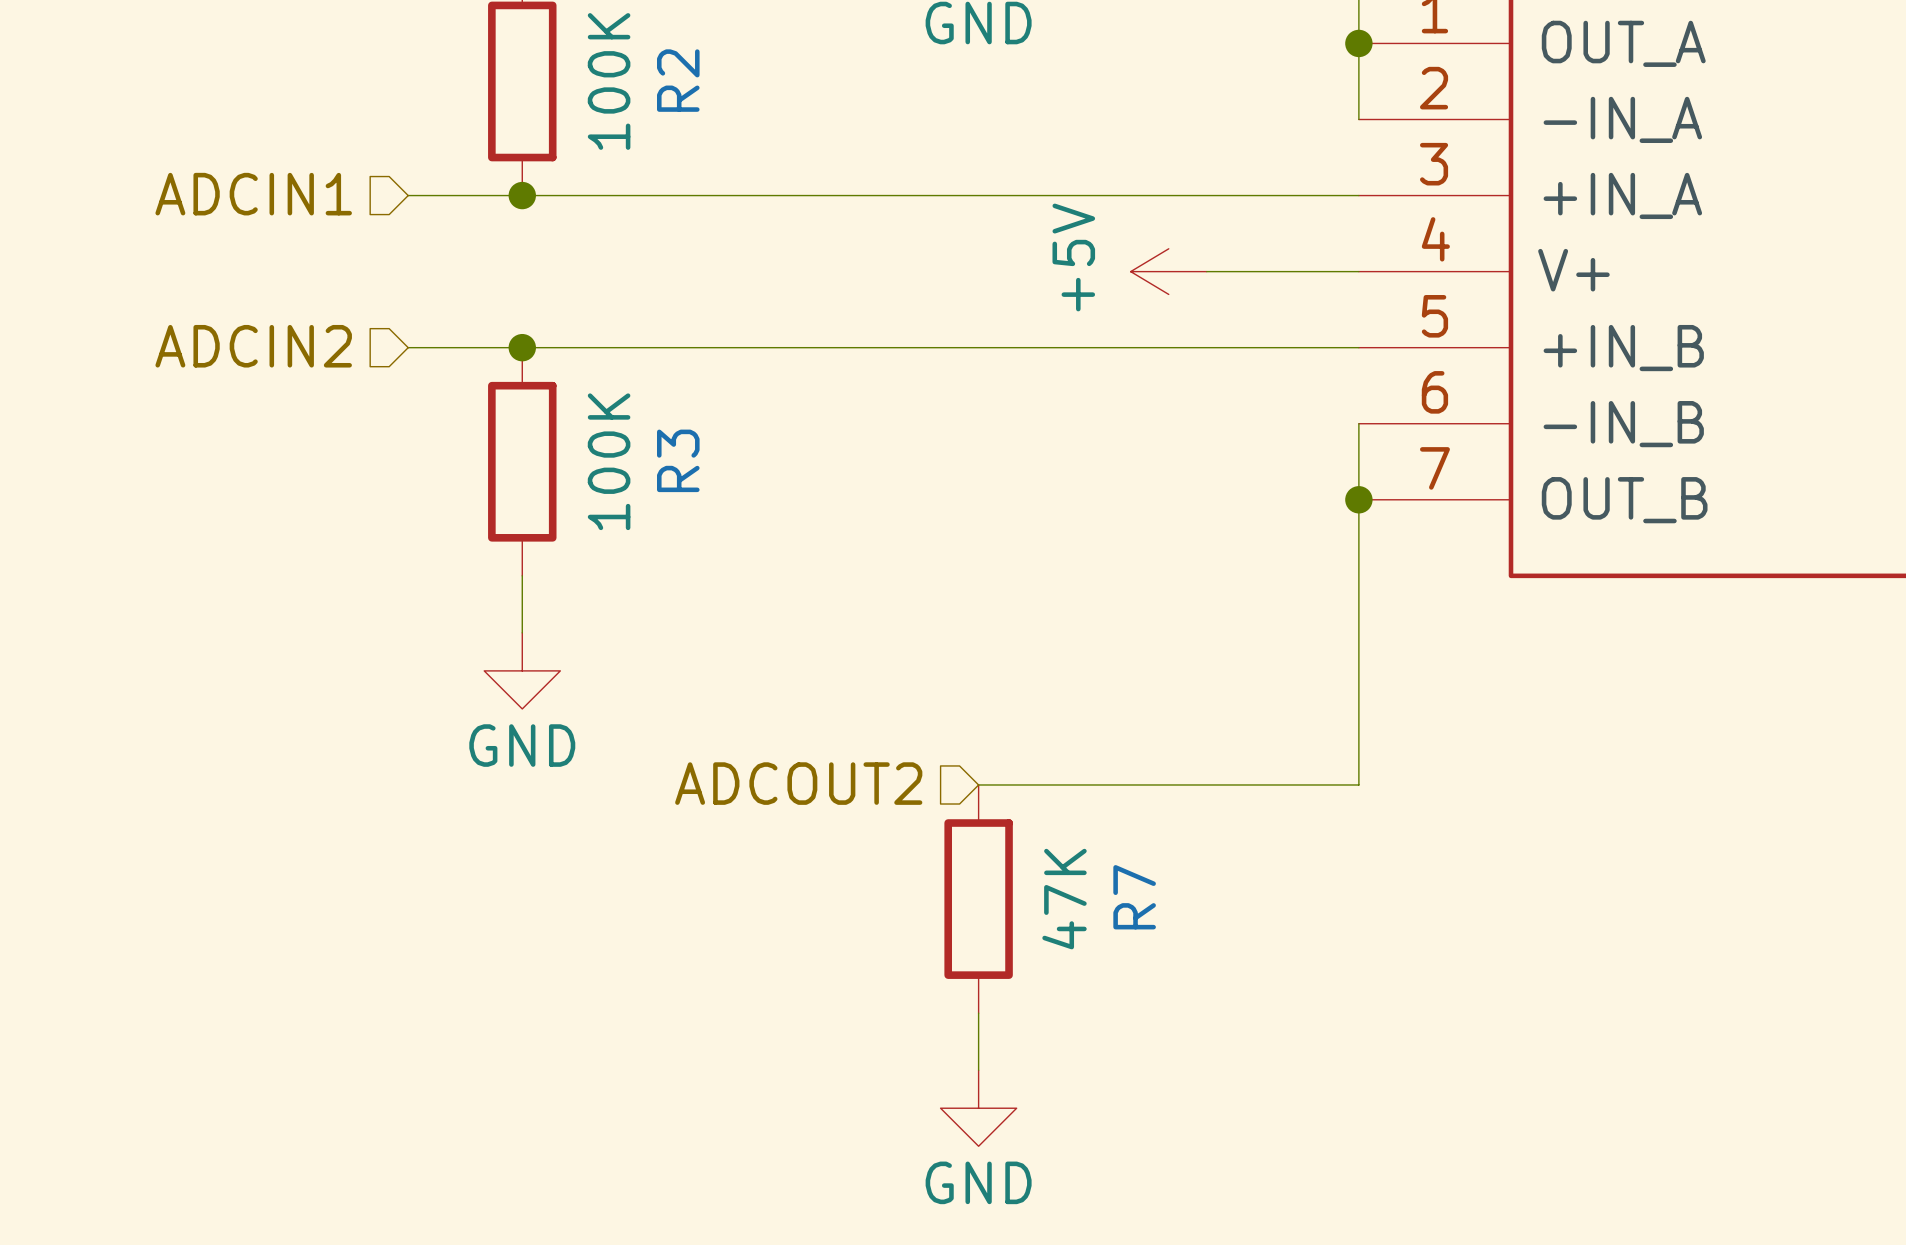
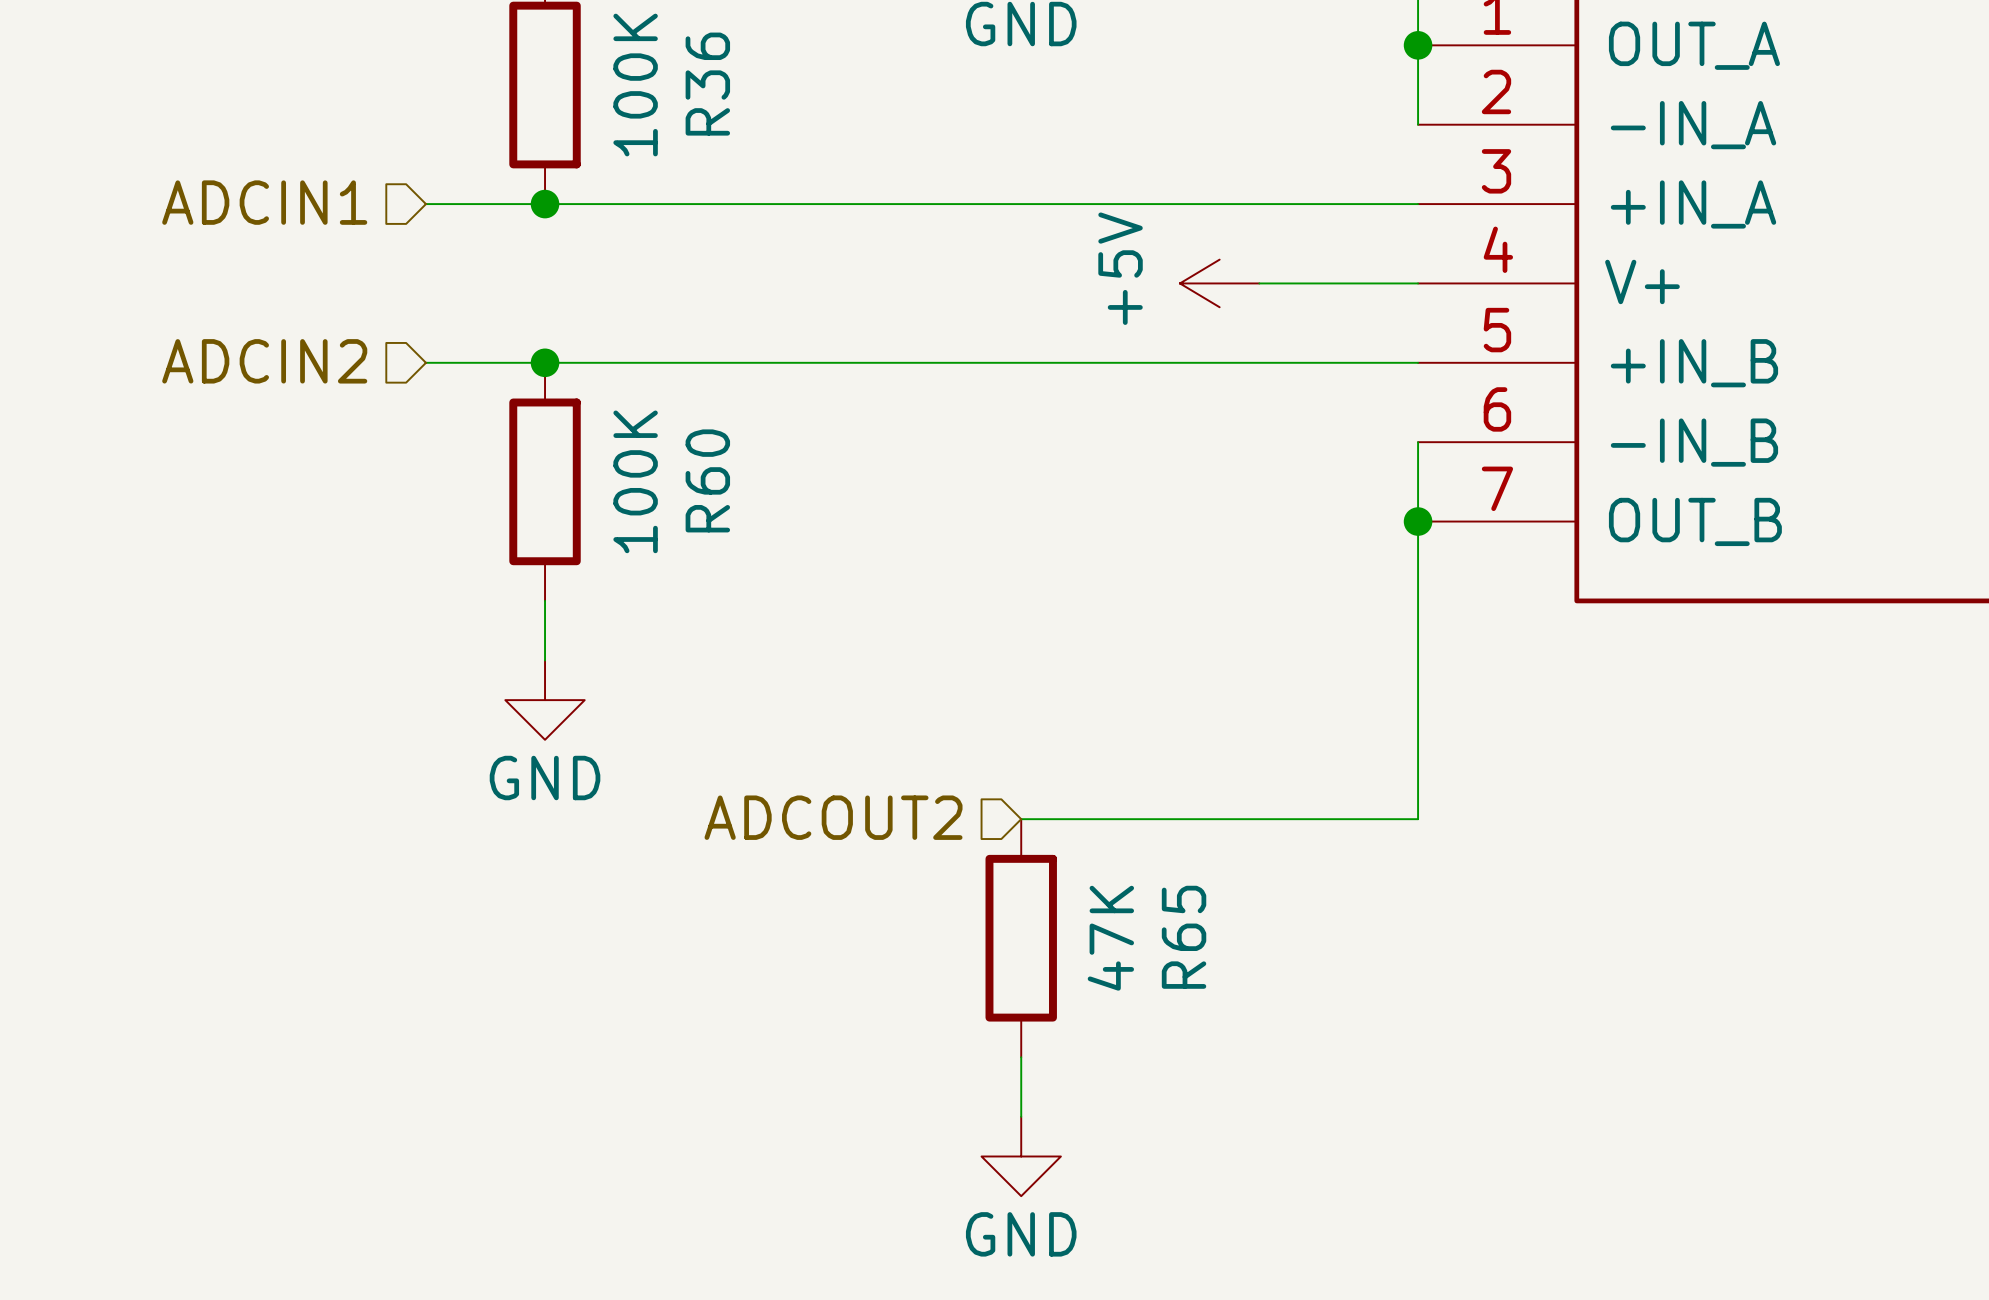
R2 name: R2 (678, 80) -> R36 (707, 84)
R3 name: R3 (678, 460) -> R60 (707, 480)
R7 name: R7 (1134, 897) -> R65 (1184, 937)

